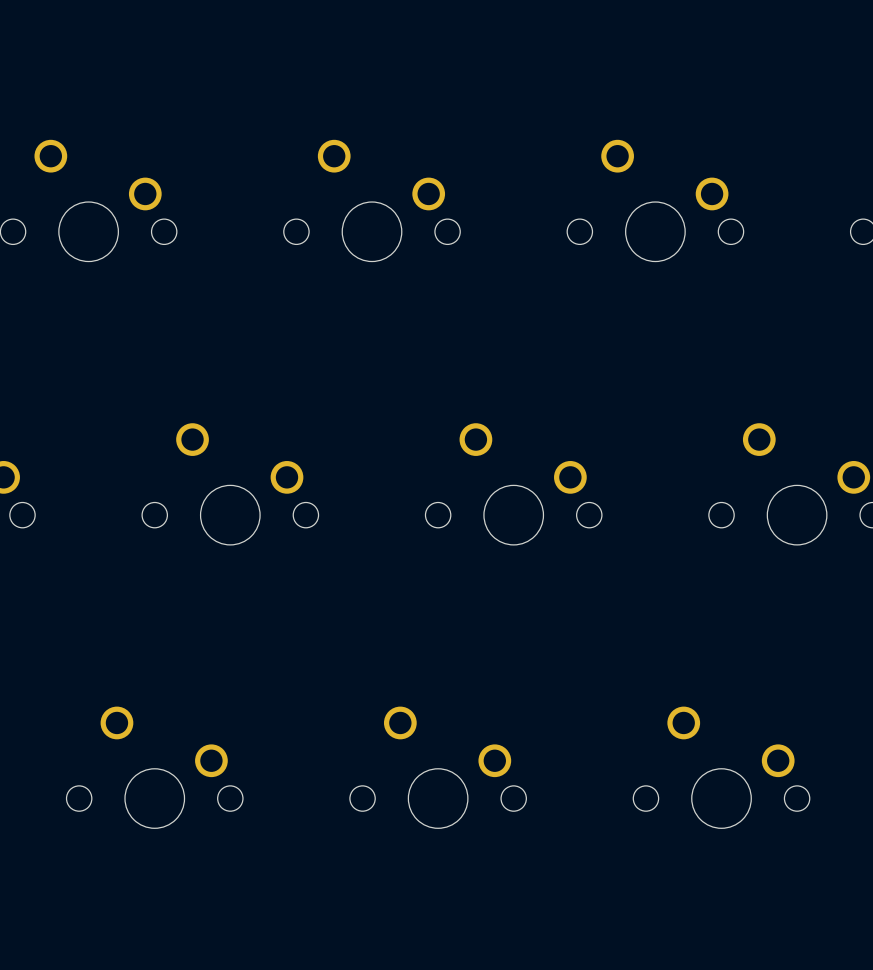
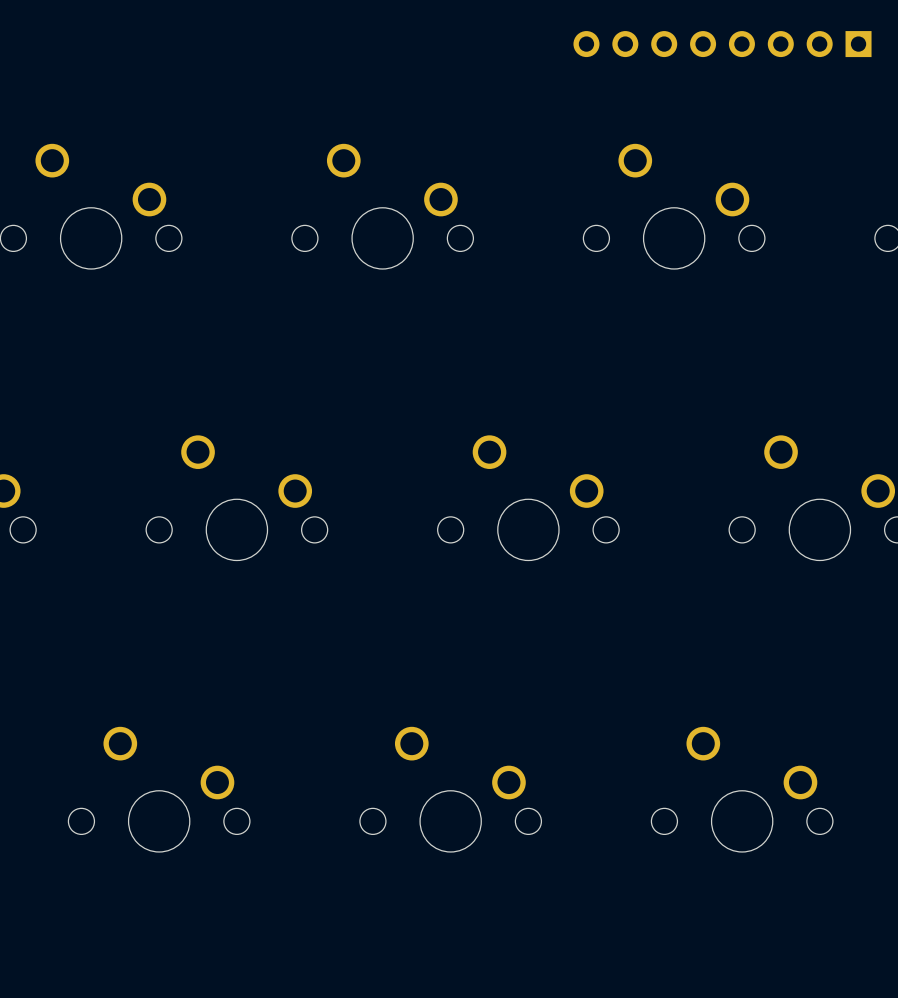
part: none -> (722, 44)

